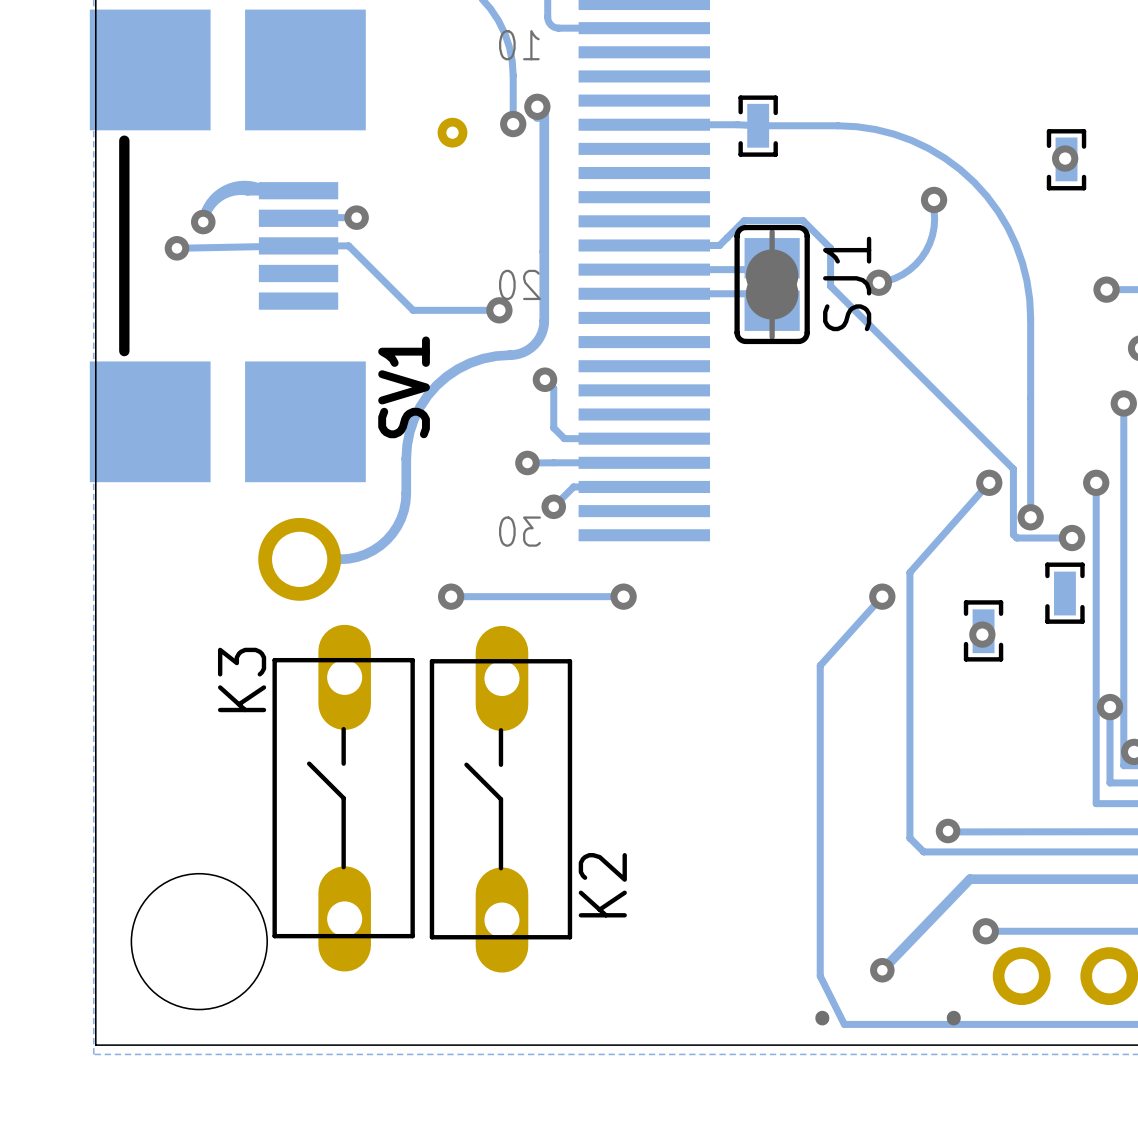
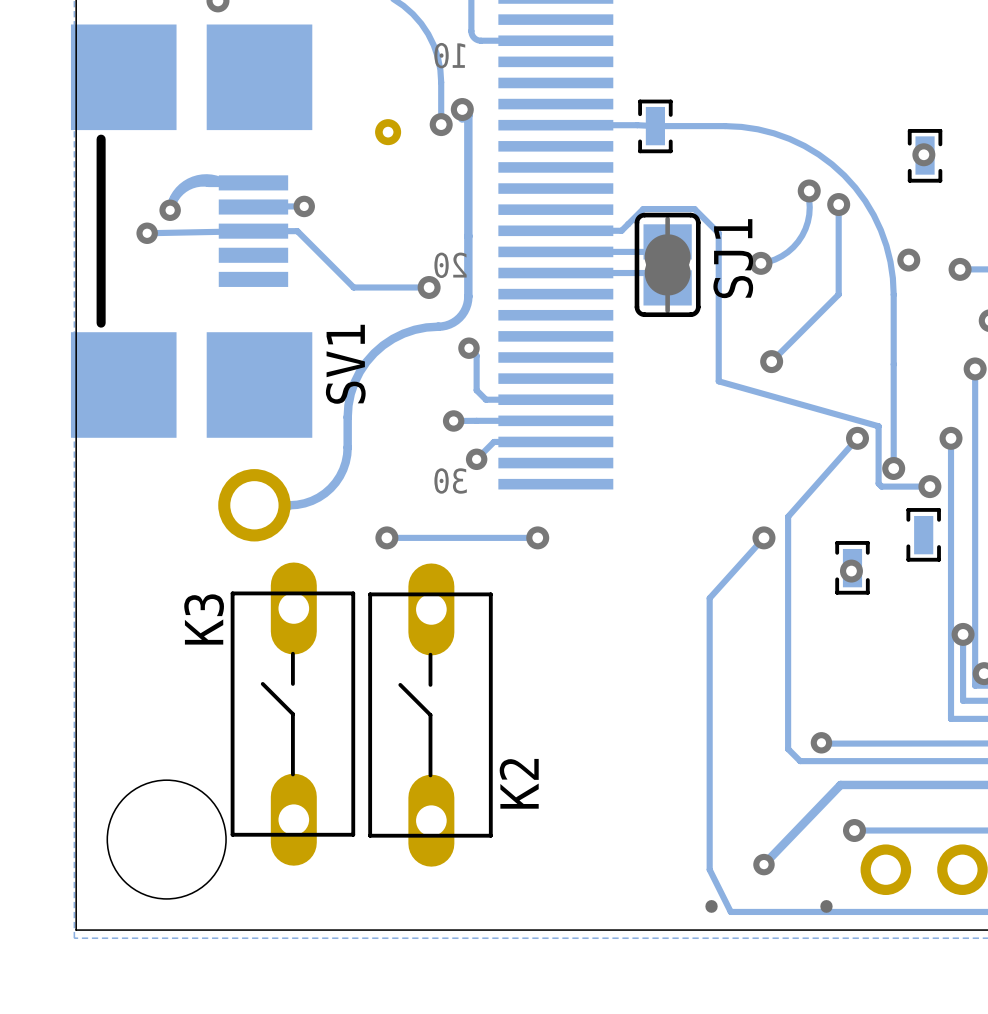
track: none -> (838, 204) (838, 294) (771, 361)
via: none -> (838, 204)
via: none -> (908, 260)
track: (830, 286) (1013, 469) -> (718, 266) (718, 381) (878, 426)
via: none -> (771, 361)

